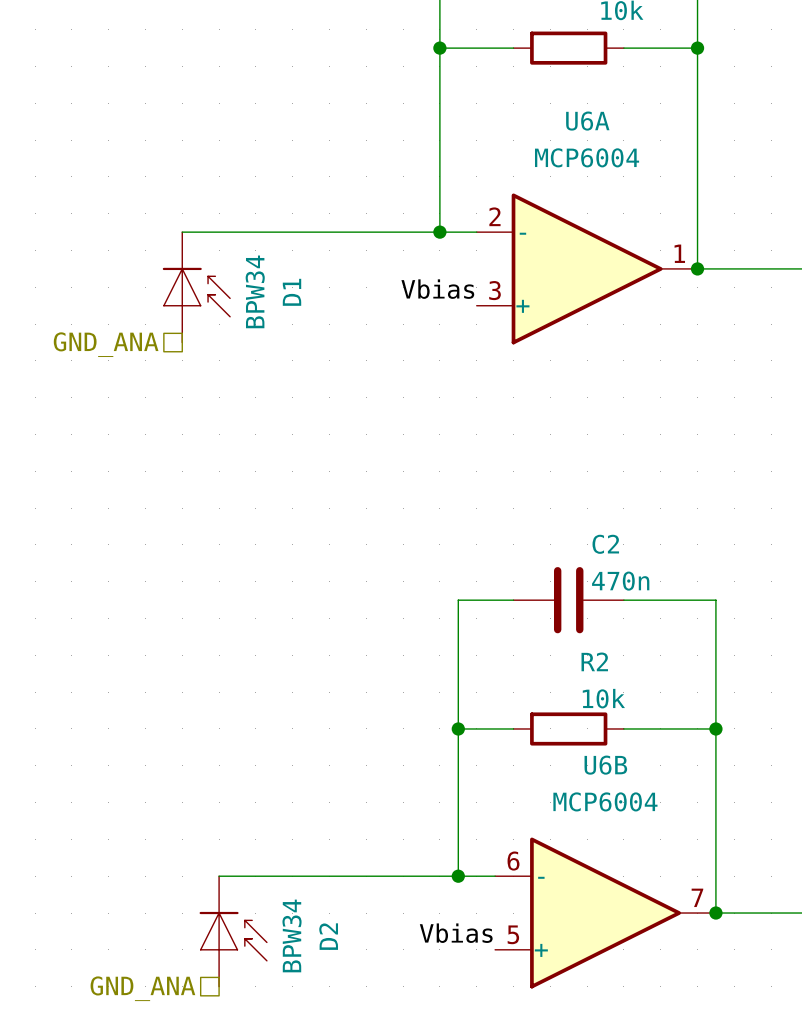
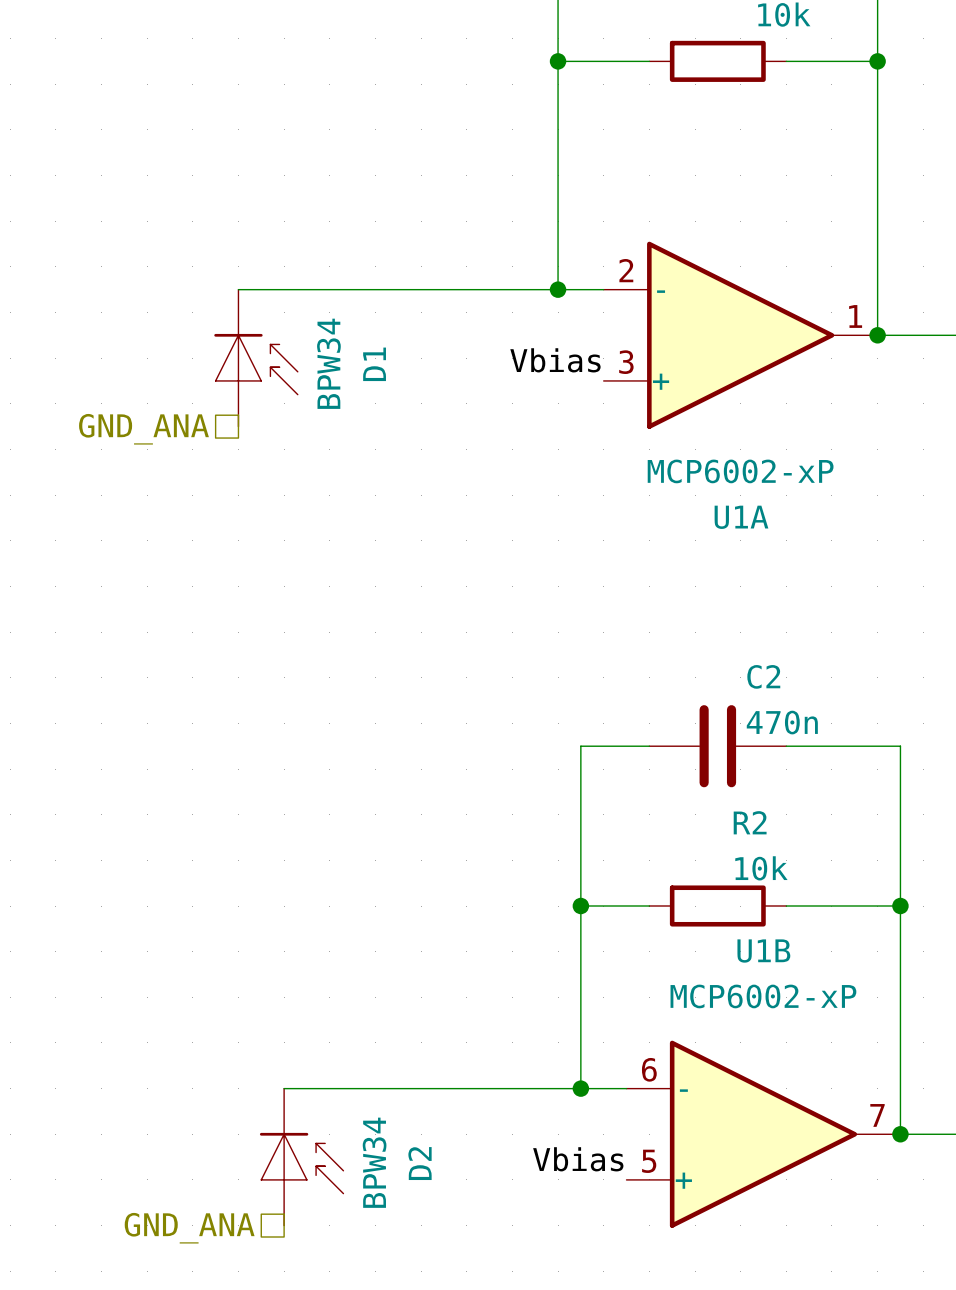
U6A name: U6A (587, 121) -> U1A (741, 517)
U6A value: MCP6004 (587, 157) -> MCP6002-xP (740, 471)
U6B name: U6B (605, 765) -> U1B (763, 951)
U6B value: MCP6004 (605, 801) -> MCP6002-xP (763, 996)

